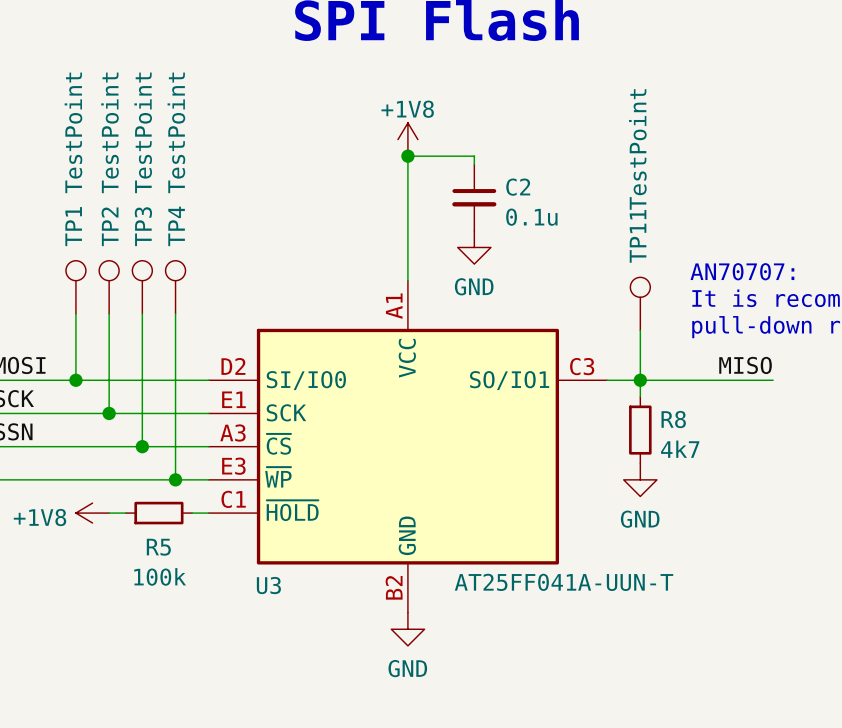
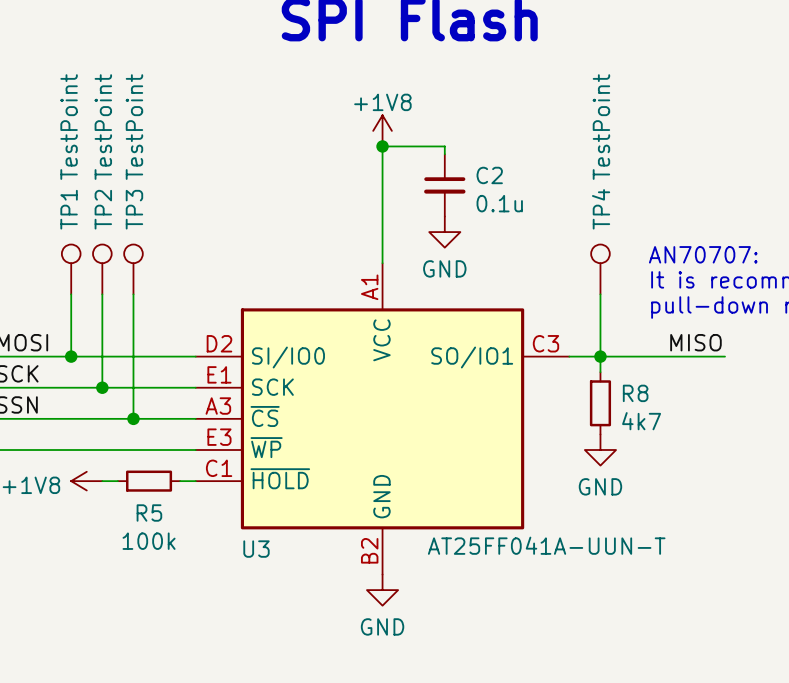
TP4 position: (175, 287) -> (600, 269)
TP11: TestPoint (640, 303) -> none
wire: (175, 313) (175, 479) -> none
junction: (175, 479) -> none

